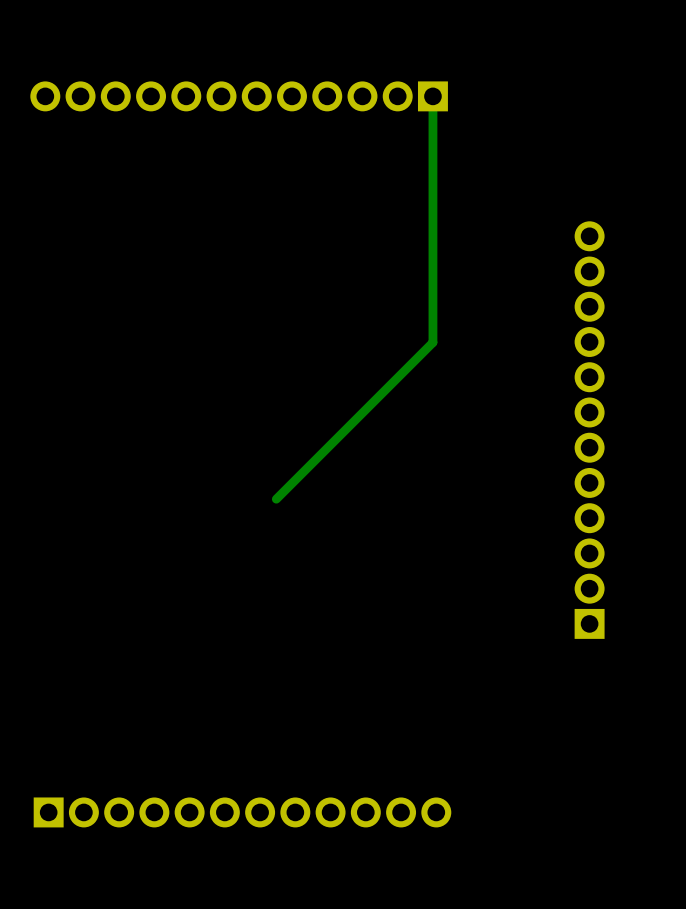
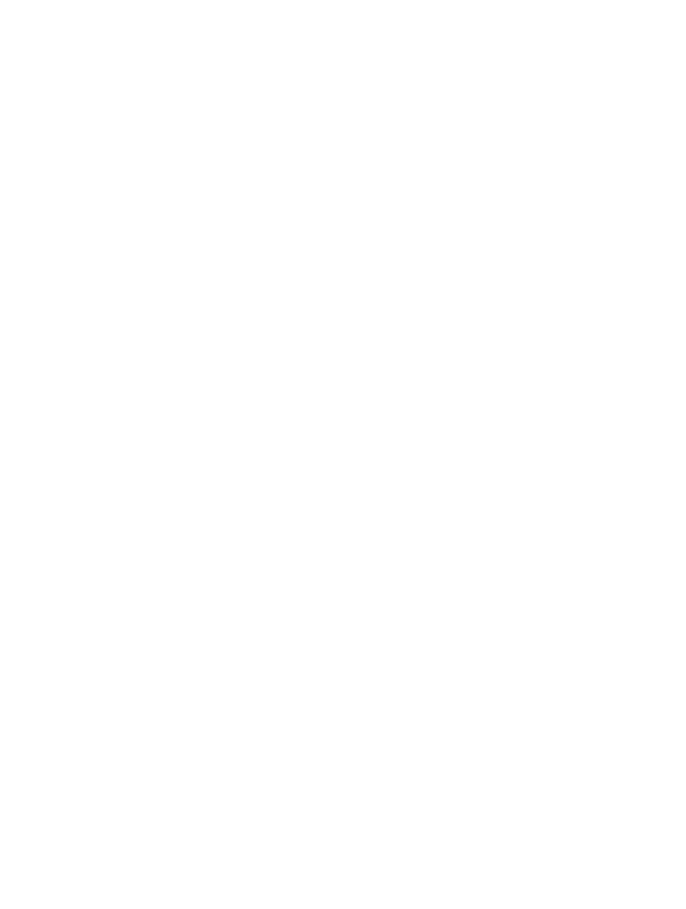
part: (239, 96) -> none
track: (432, 96) (432, 342) (276, 499) -> none
part: (589, 430) -> none
part: (242, 812) -> none

